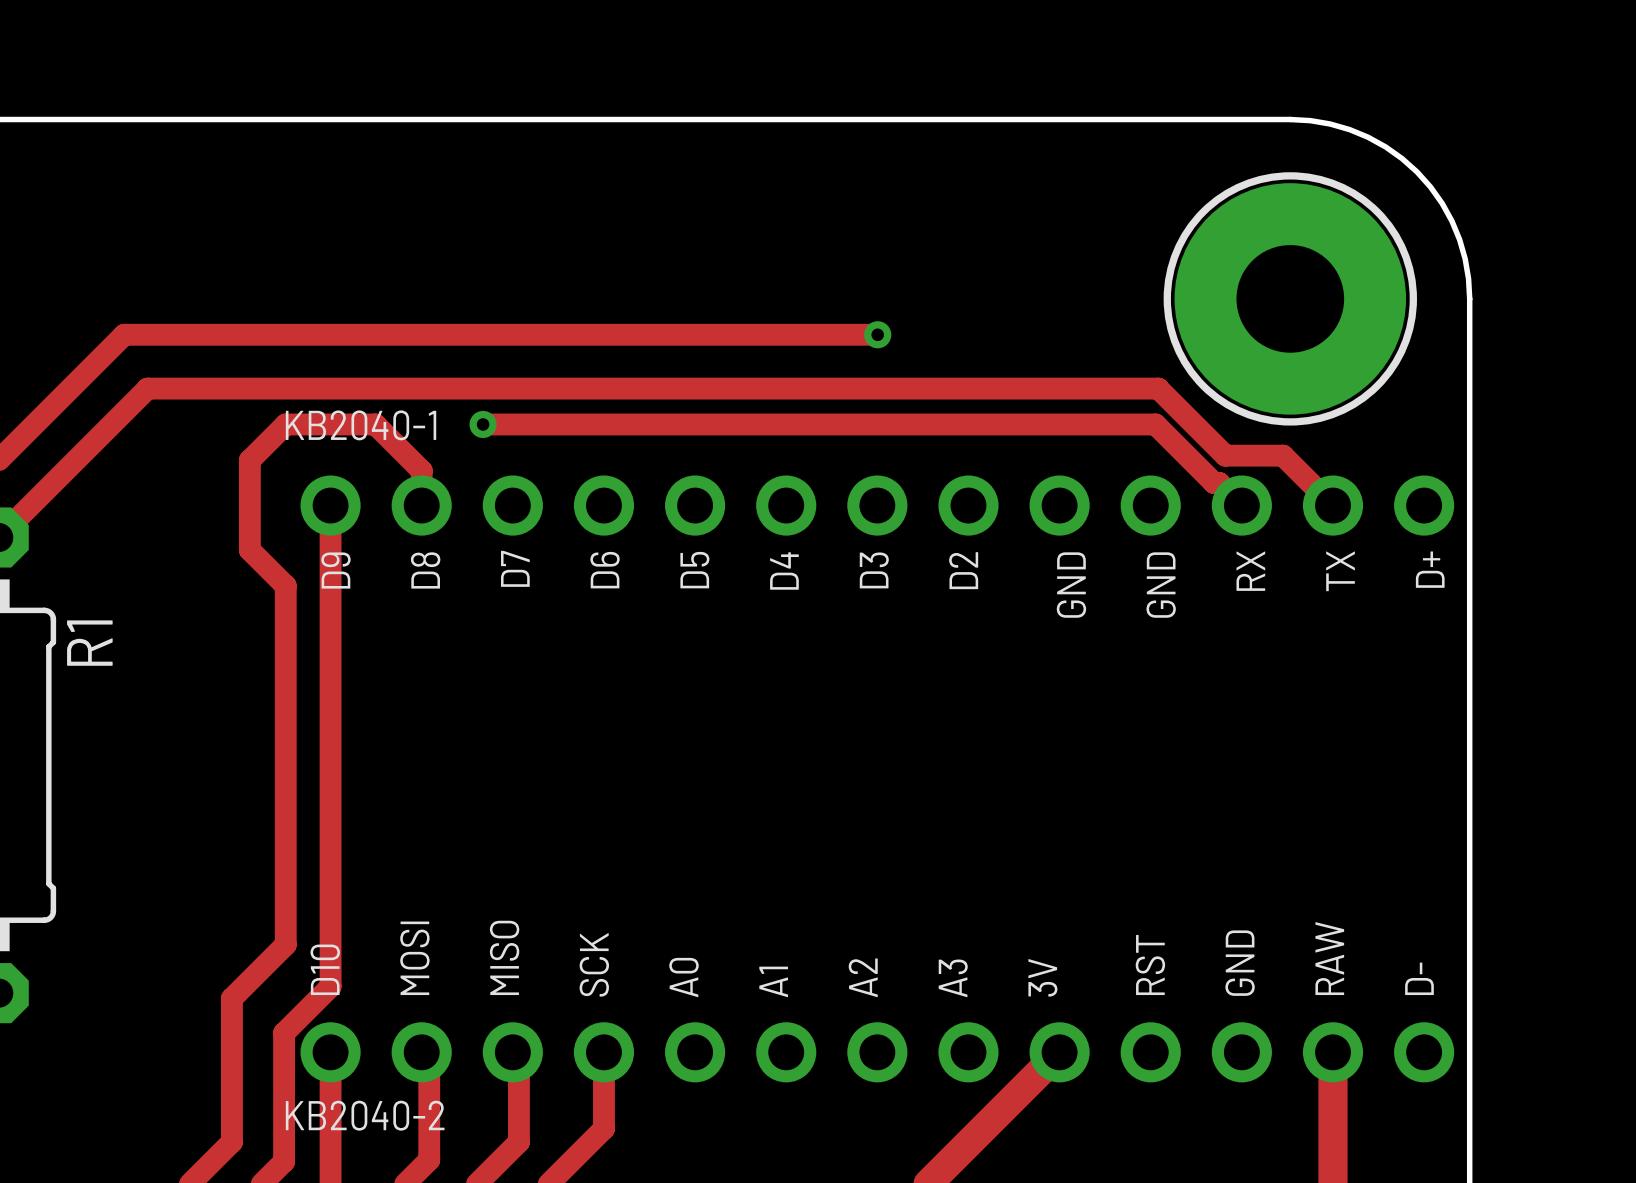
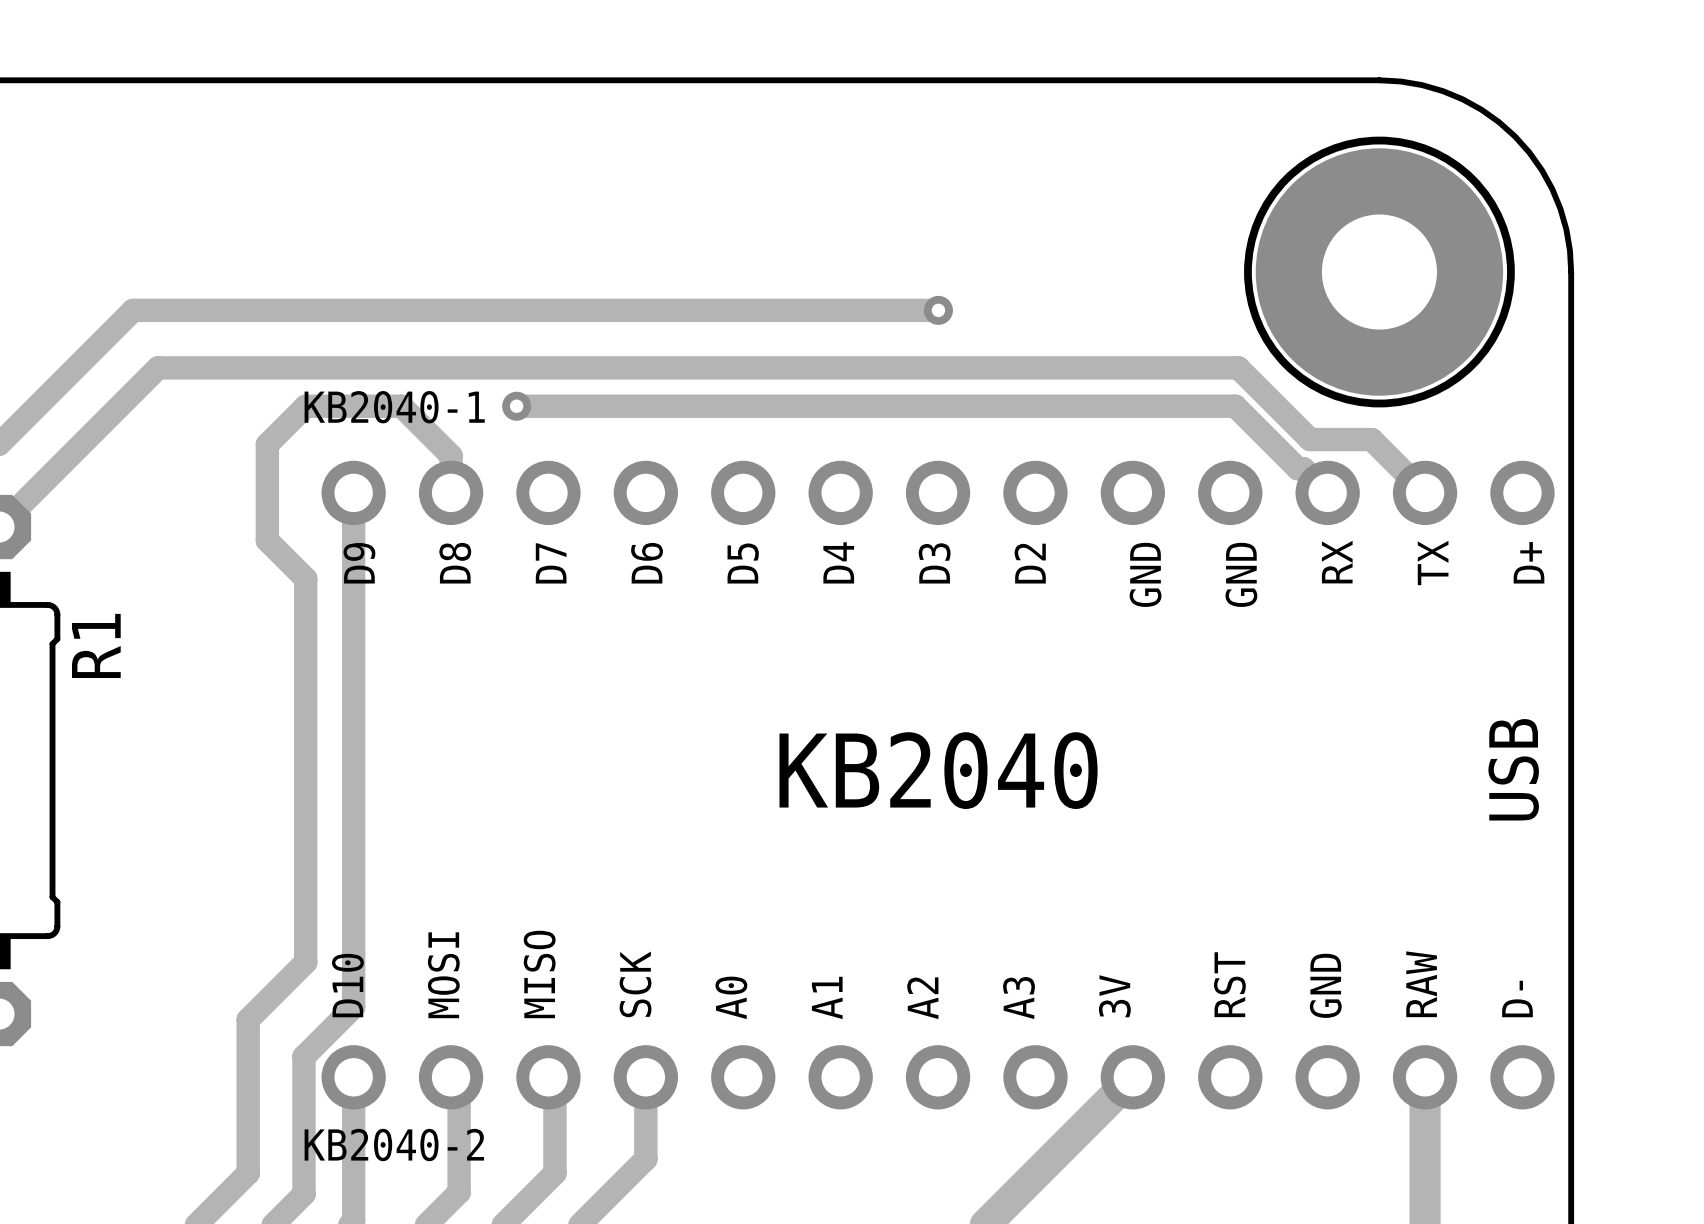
text: none -> USB (1513, 769)
text: none -> KB2040 (938, 770)

